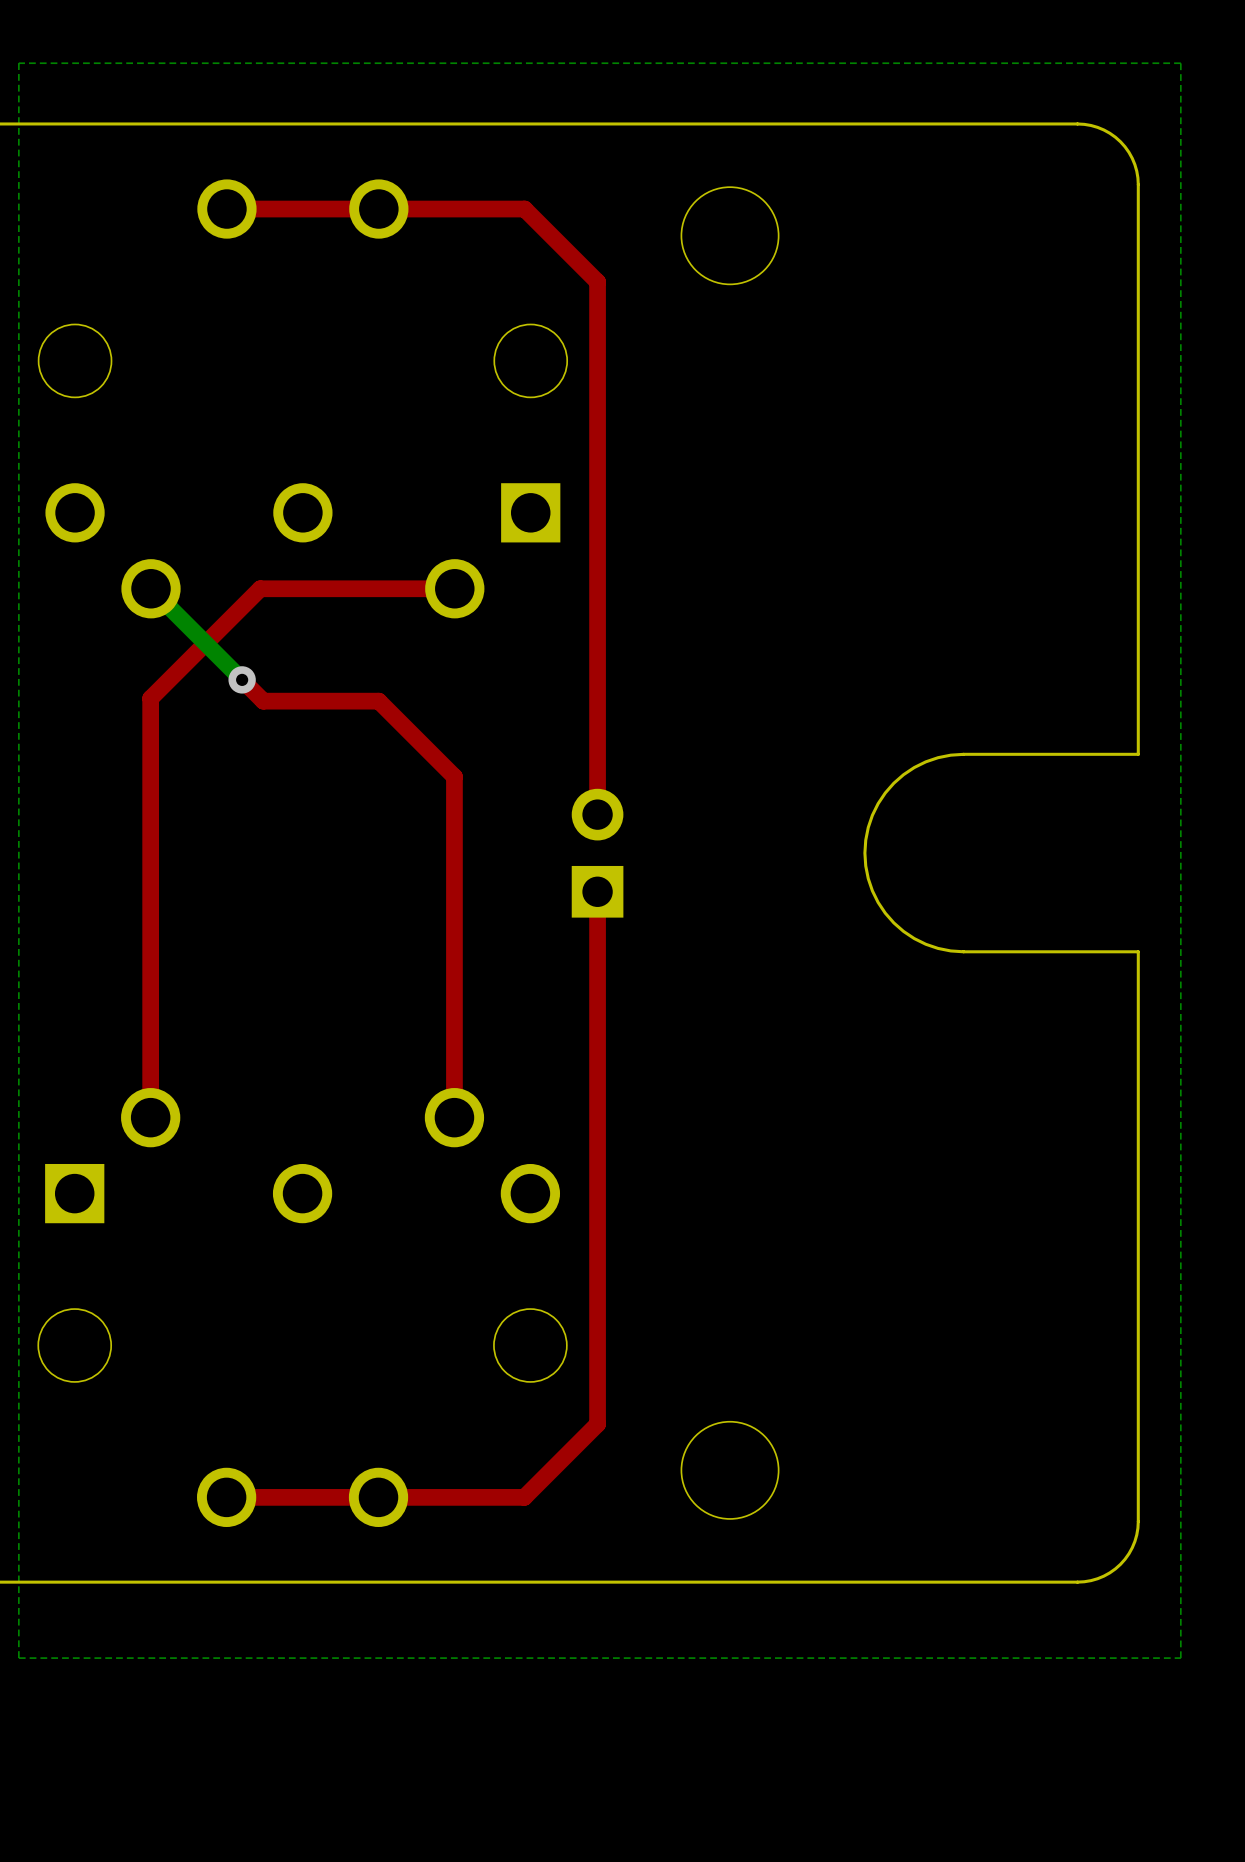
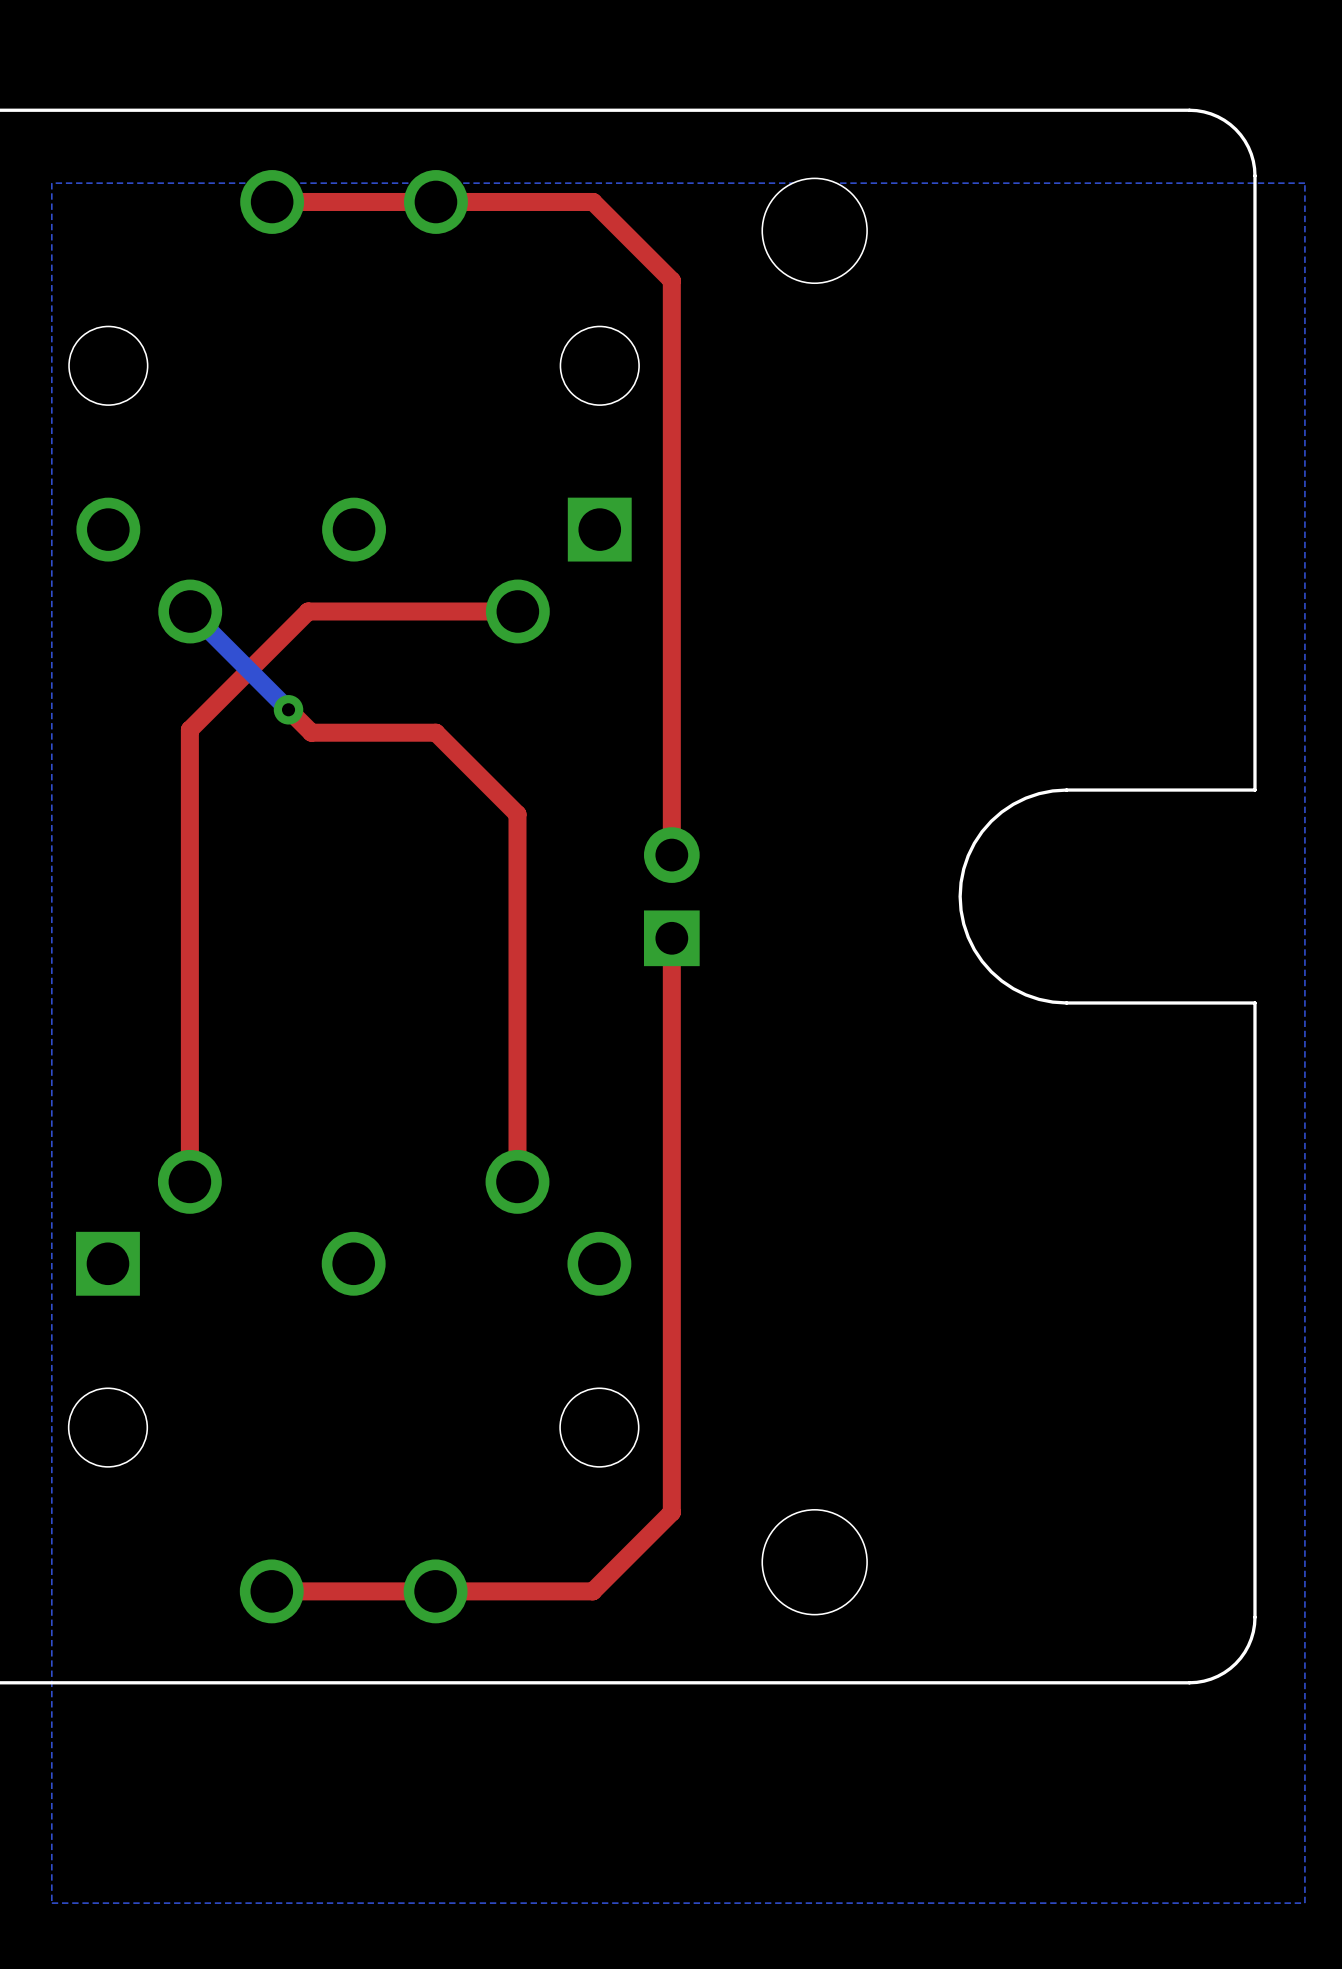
bottom zone outline: (1180, 63) (1180, 1658) (18, 1658) (18, 63) (1180, 63) -> (1304, 183) (1304, 1903) (51, 1903) (51, 183) (1304, 183)

